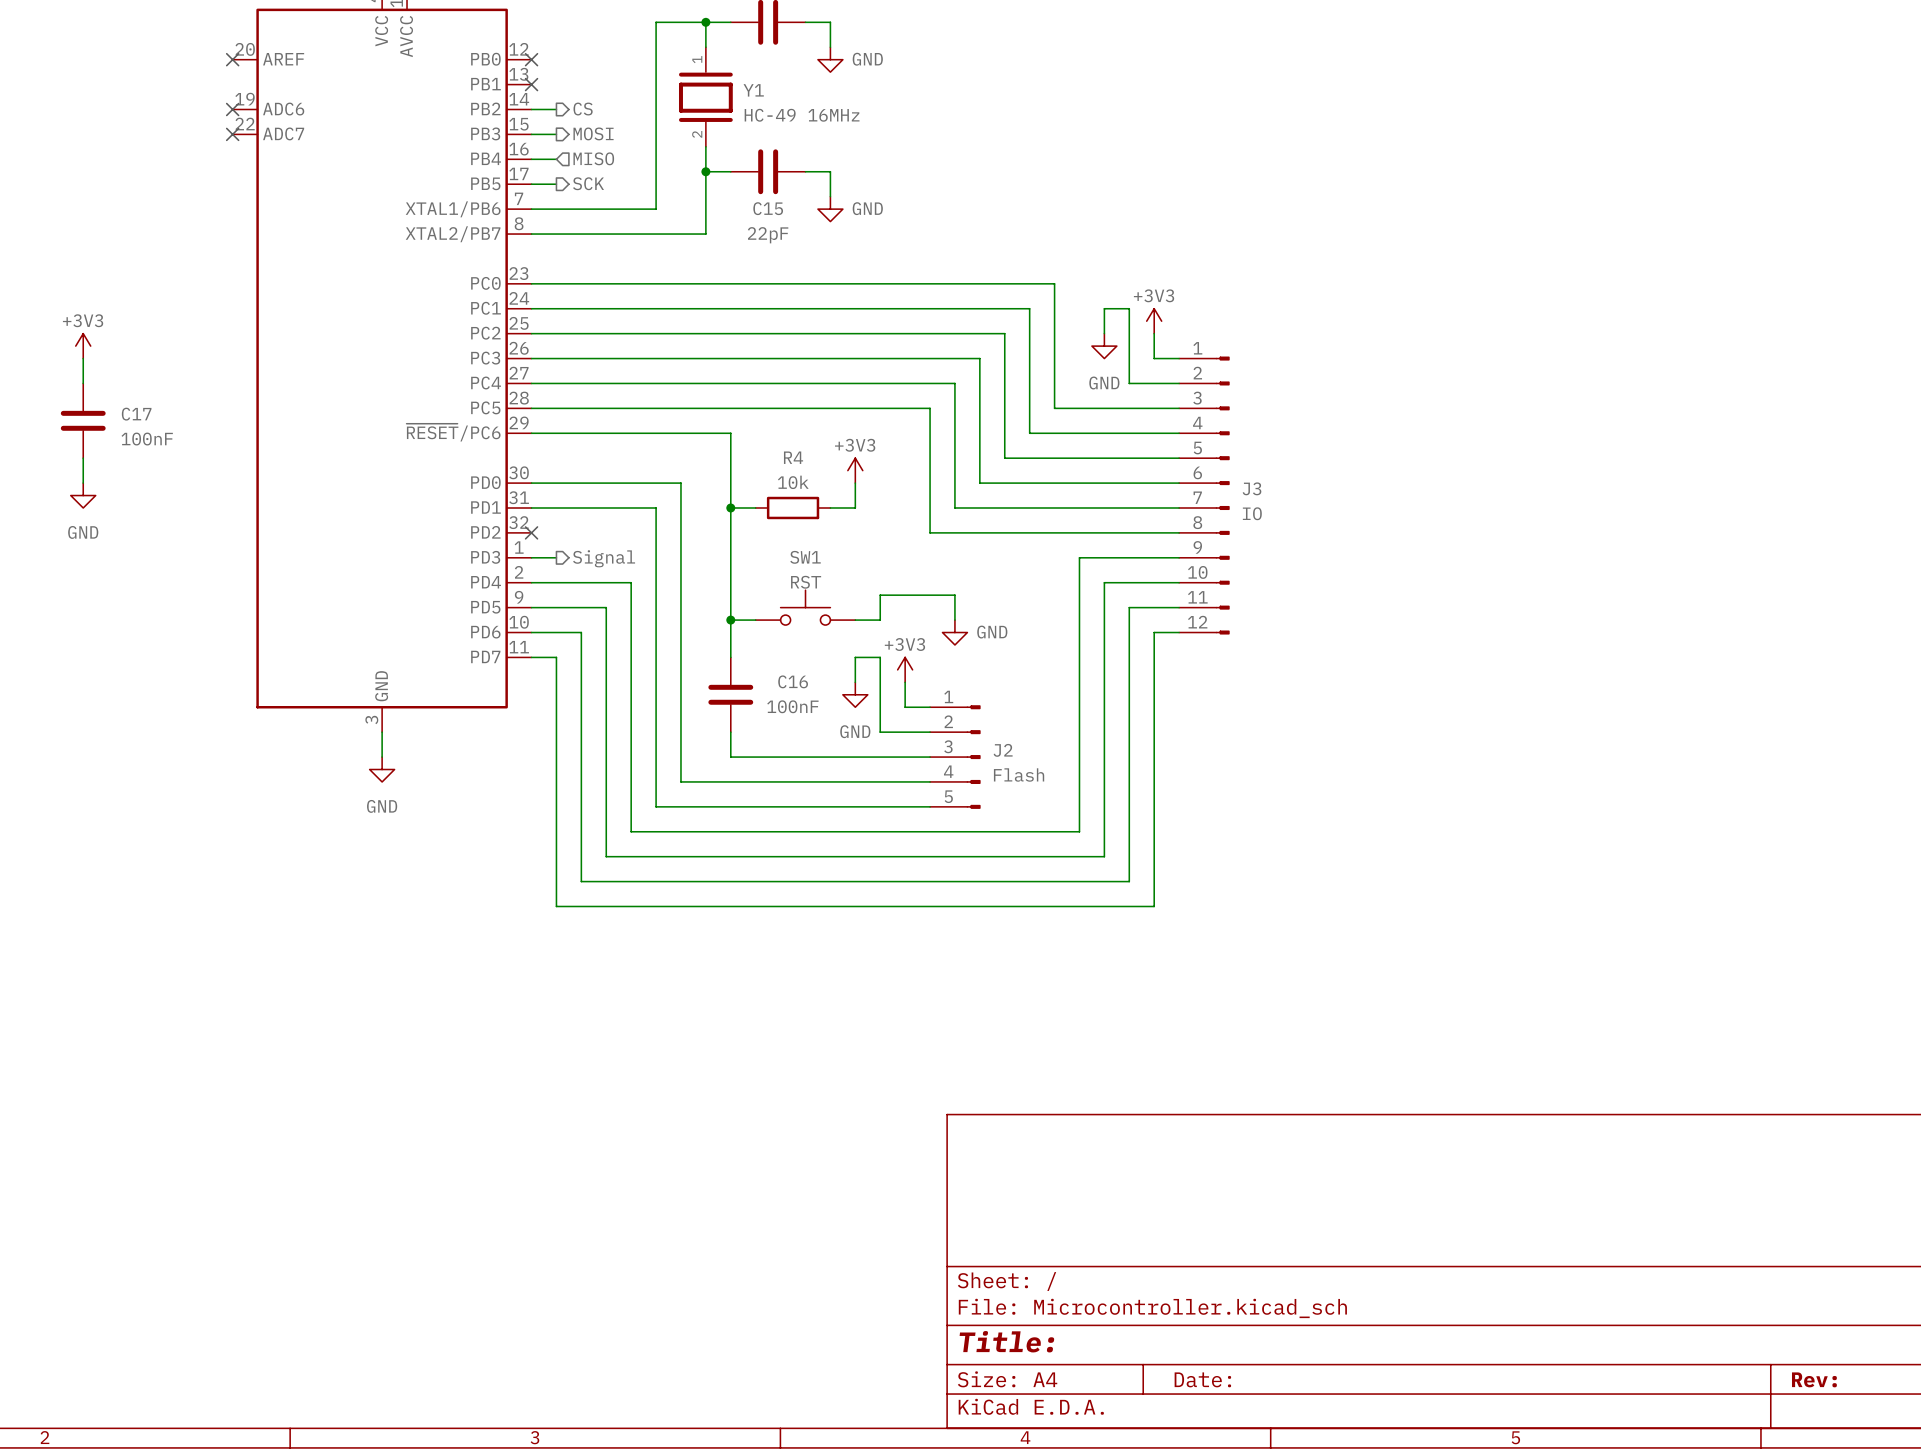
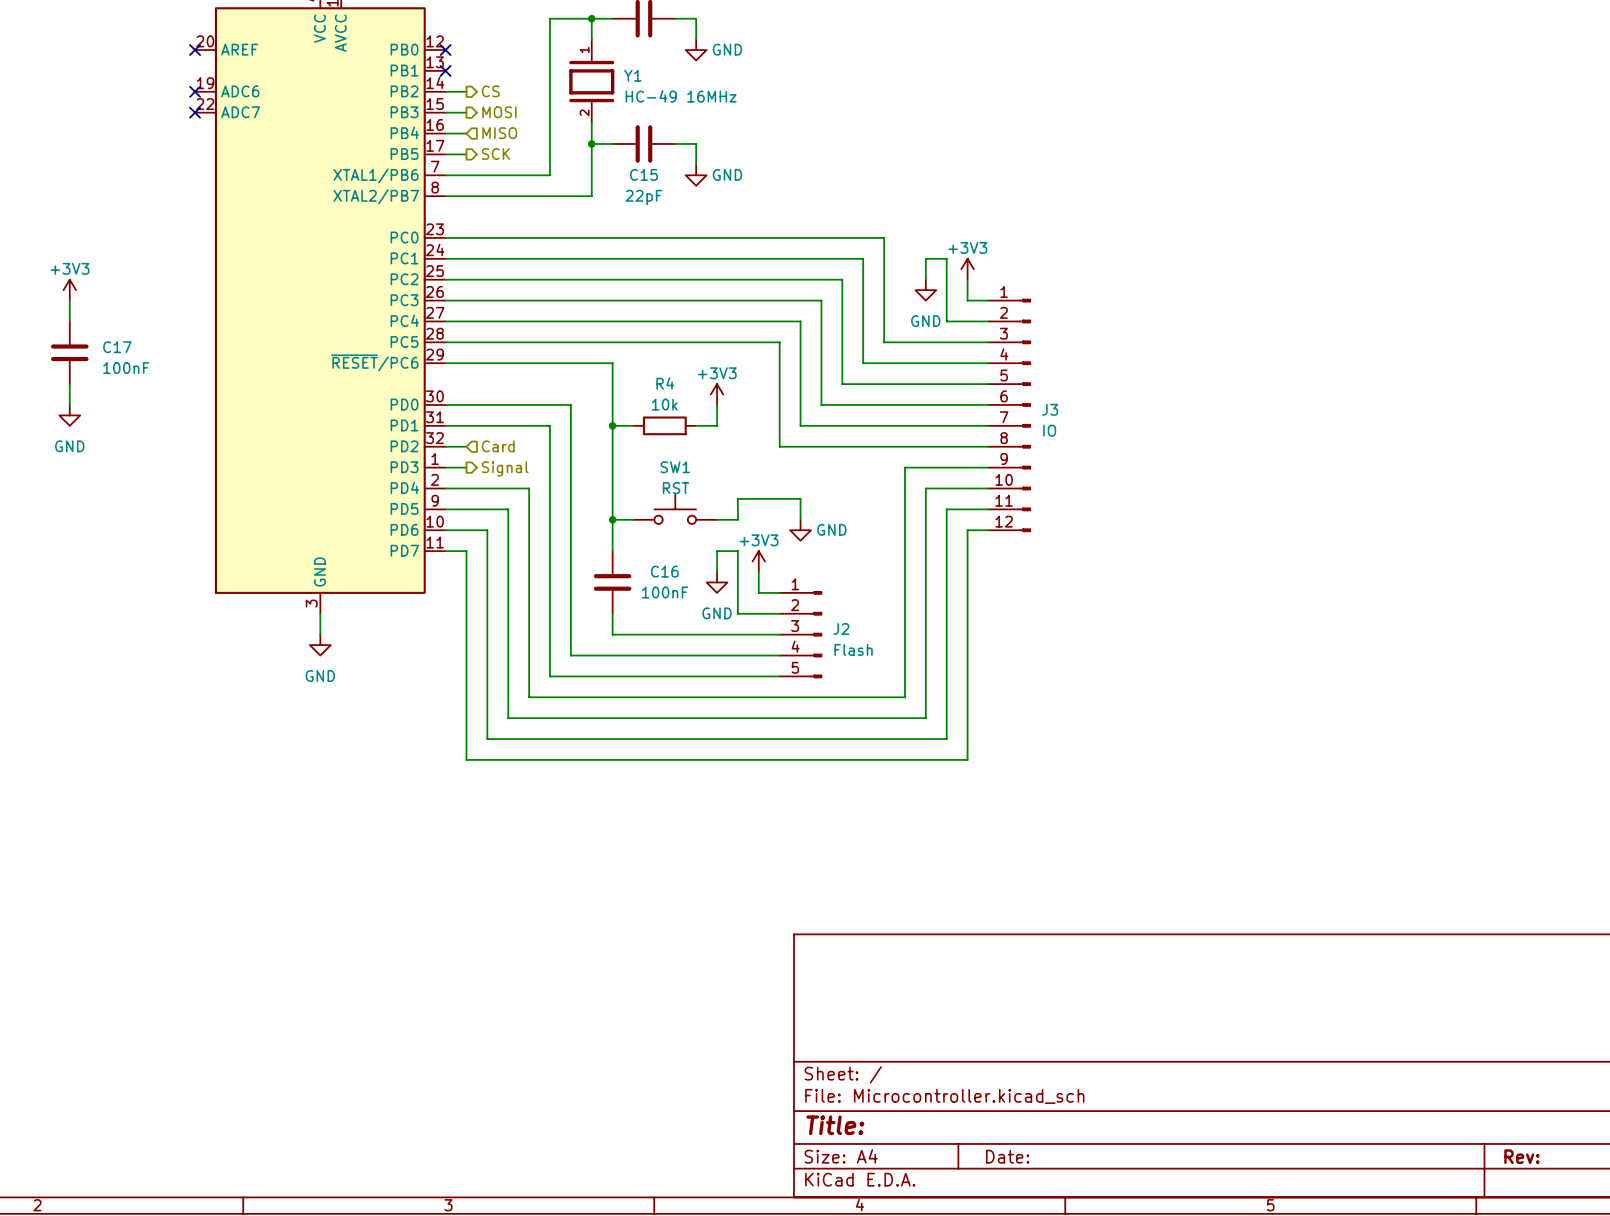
wire: none -> (445, 446) (466, 446)
no-connect mark: (531, 532) -> none
hierarchical label: none -> Card (498, 446)

